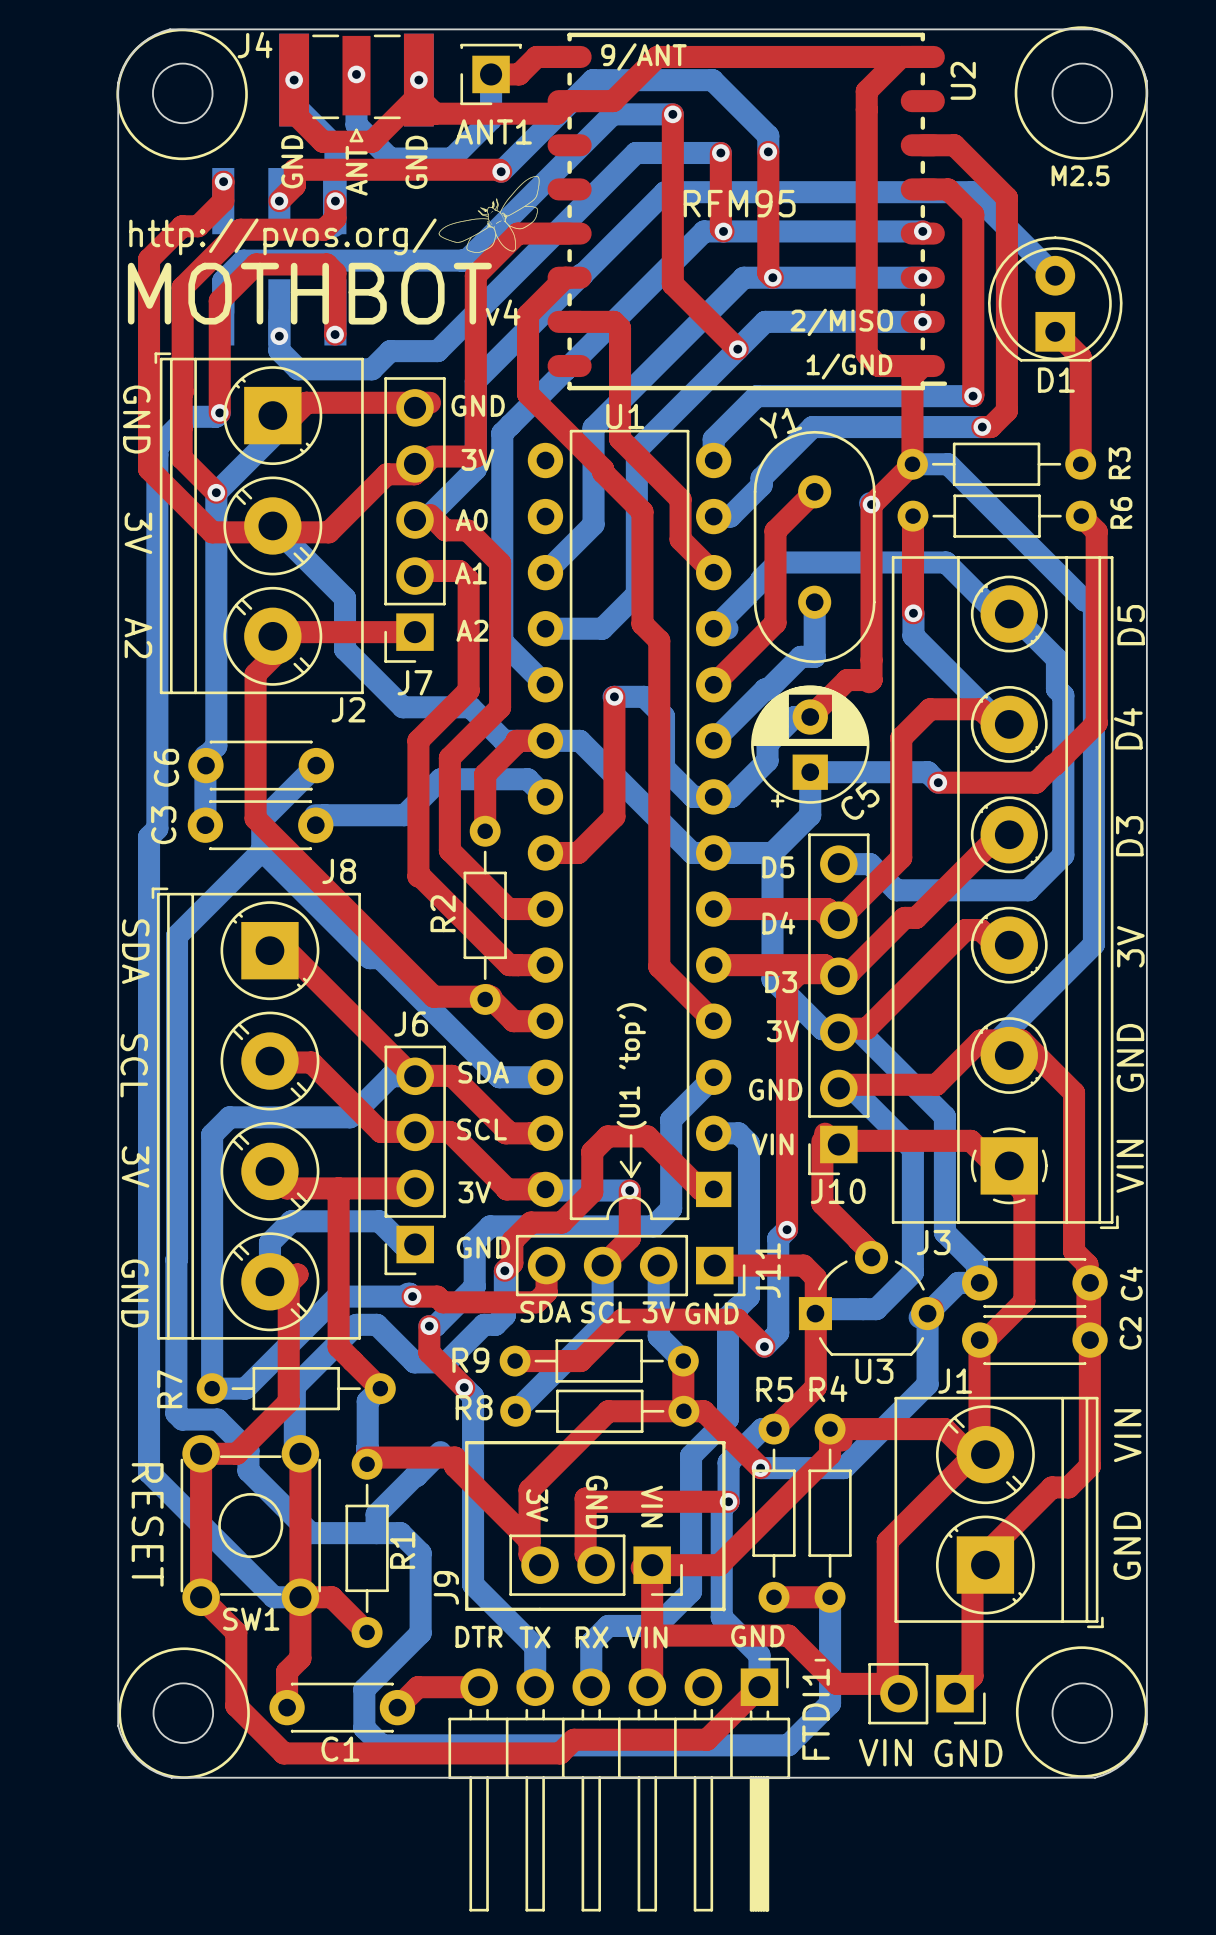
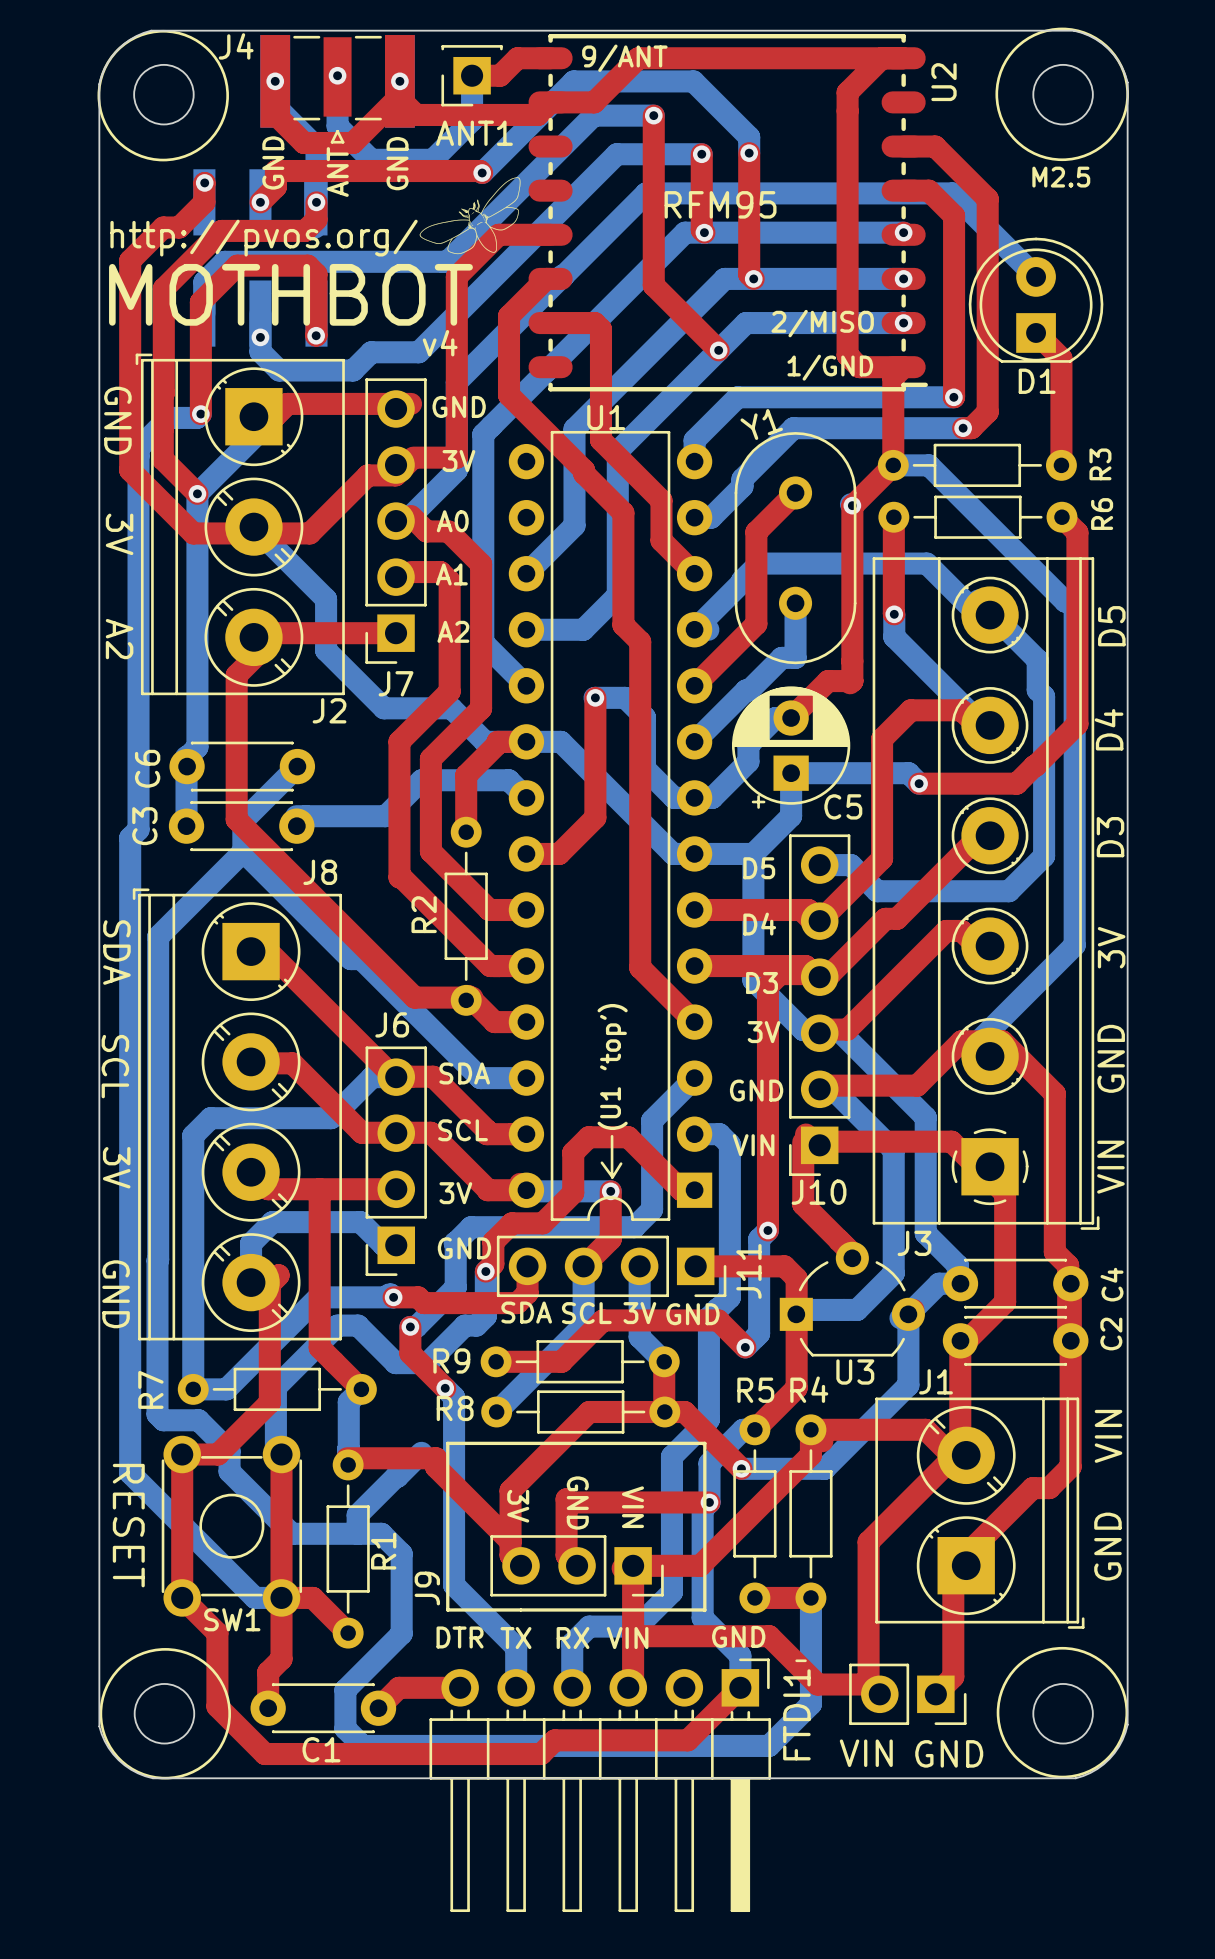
text position: v4 (503, 312) -> v4 (440, 343)
C5 name rotation: 0° (860, 800) -> 40° clockwise (843, 806)

